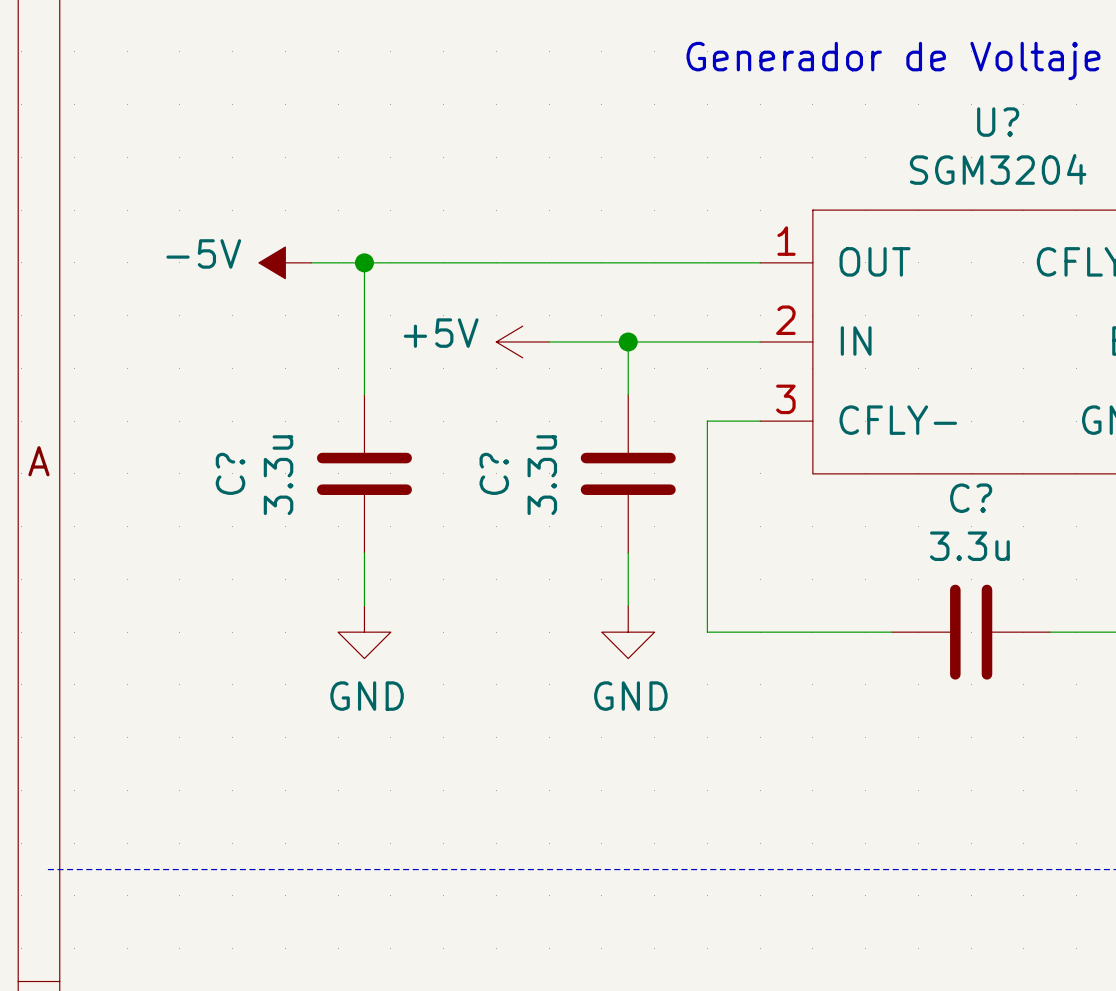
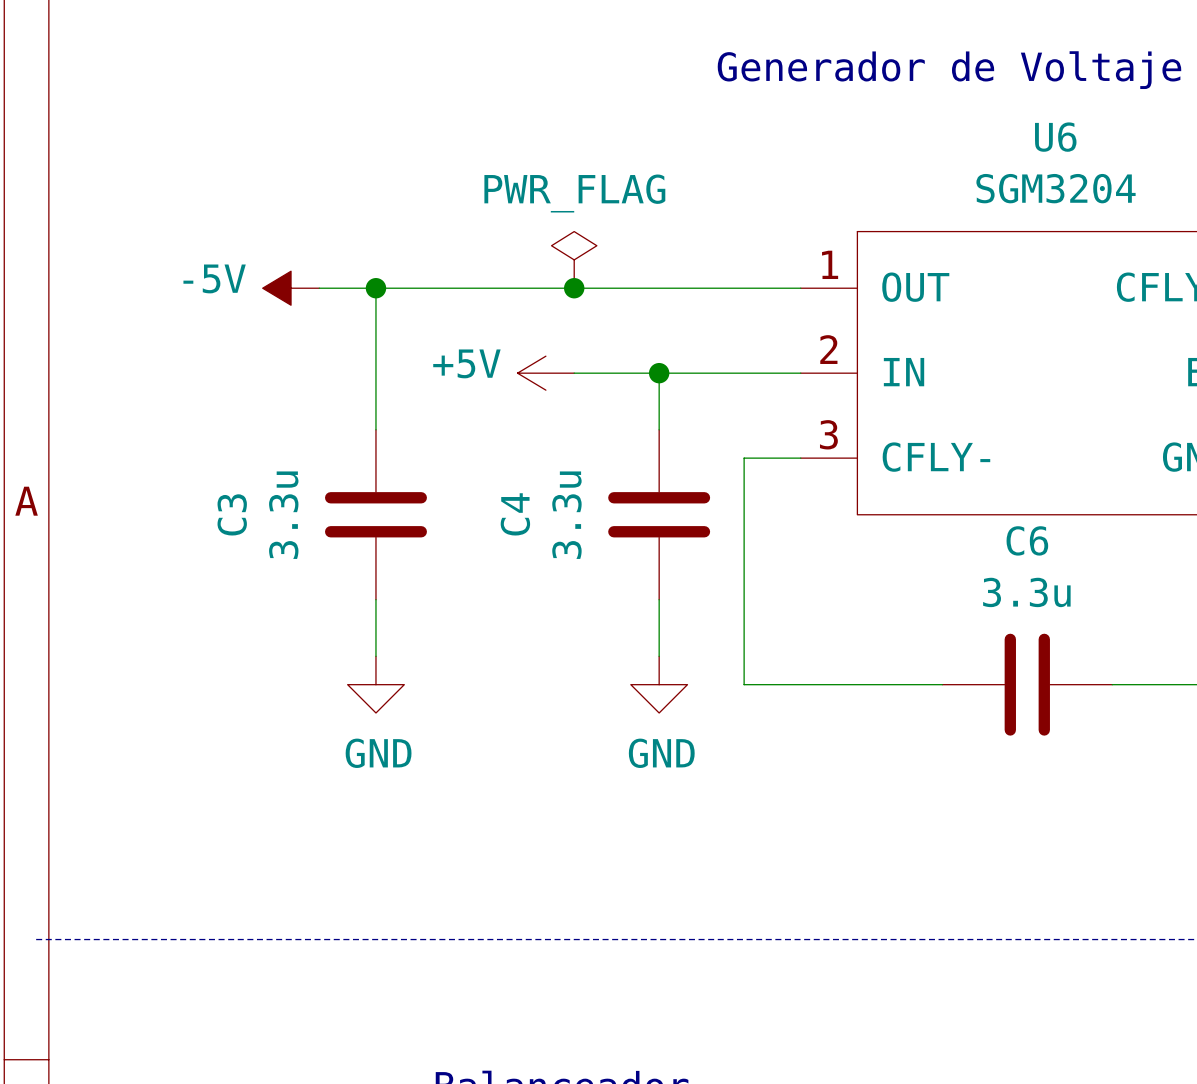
U? name: U? (998, 122) -> U6 (1055, 137)
power symbol: none -> PWR_FLAG (574, 259)
junction: none -> (574, 288)
C? name: C? (230, 473) -> C3 (232, 514)
C? name: C? (494, 473) -> C4 (515, 514)
C? name: C? (971, 498) -> C6 (1027, 540)

